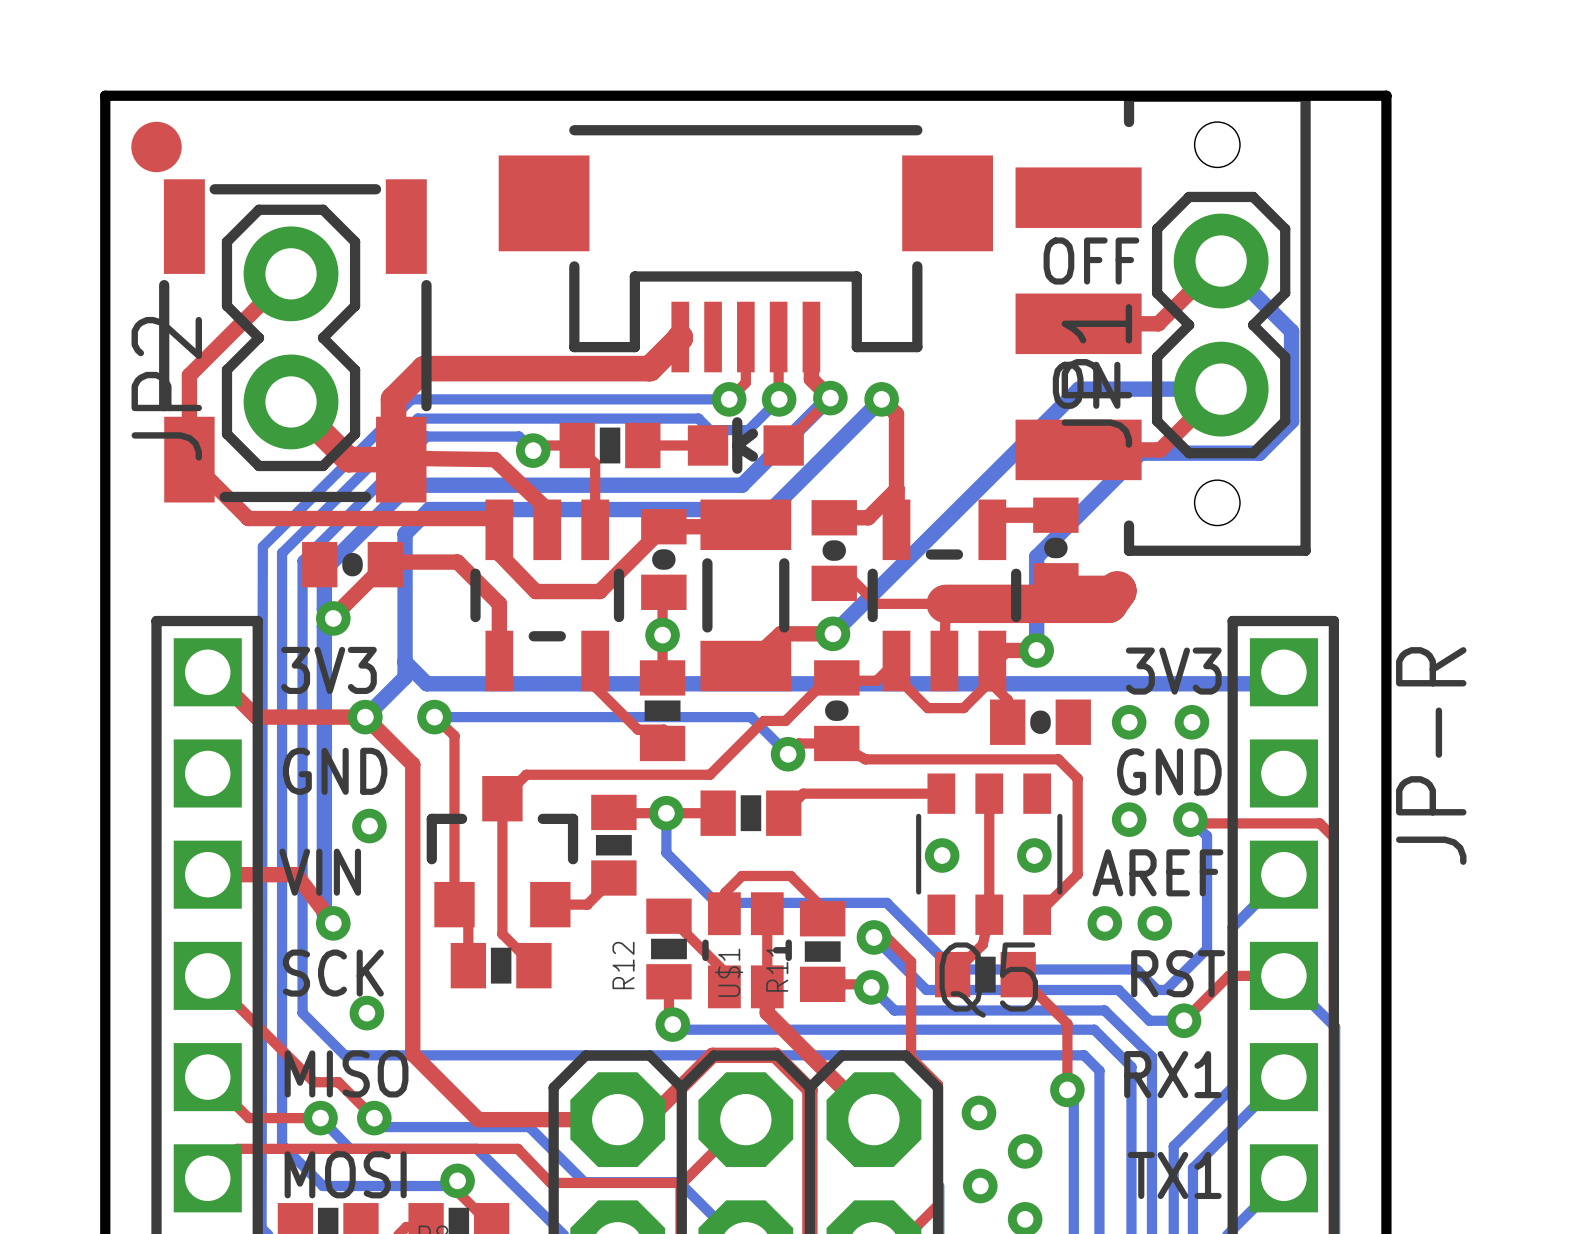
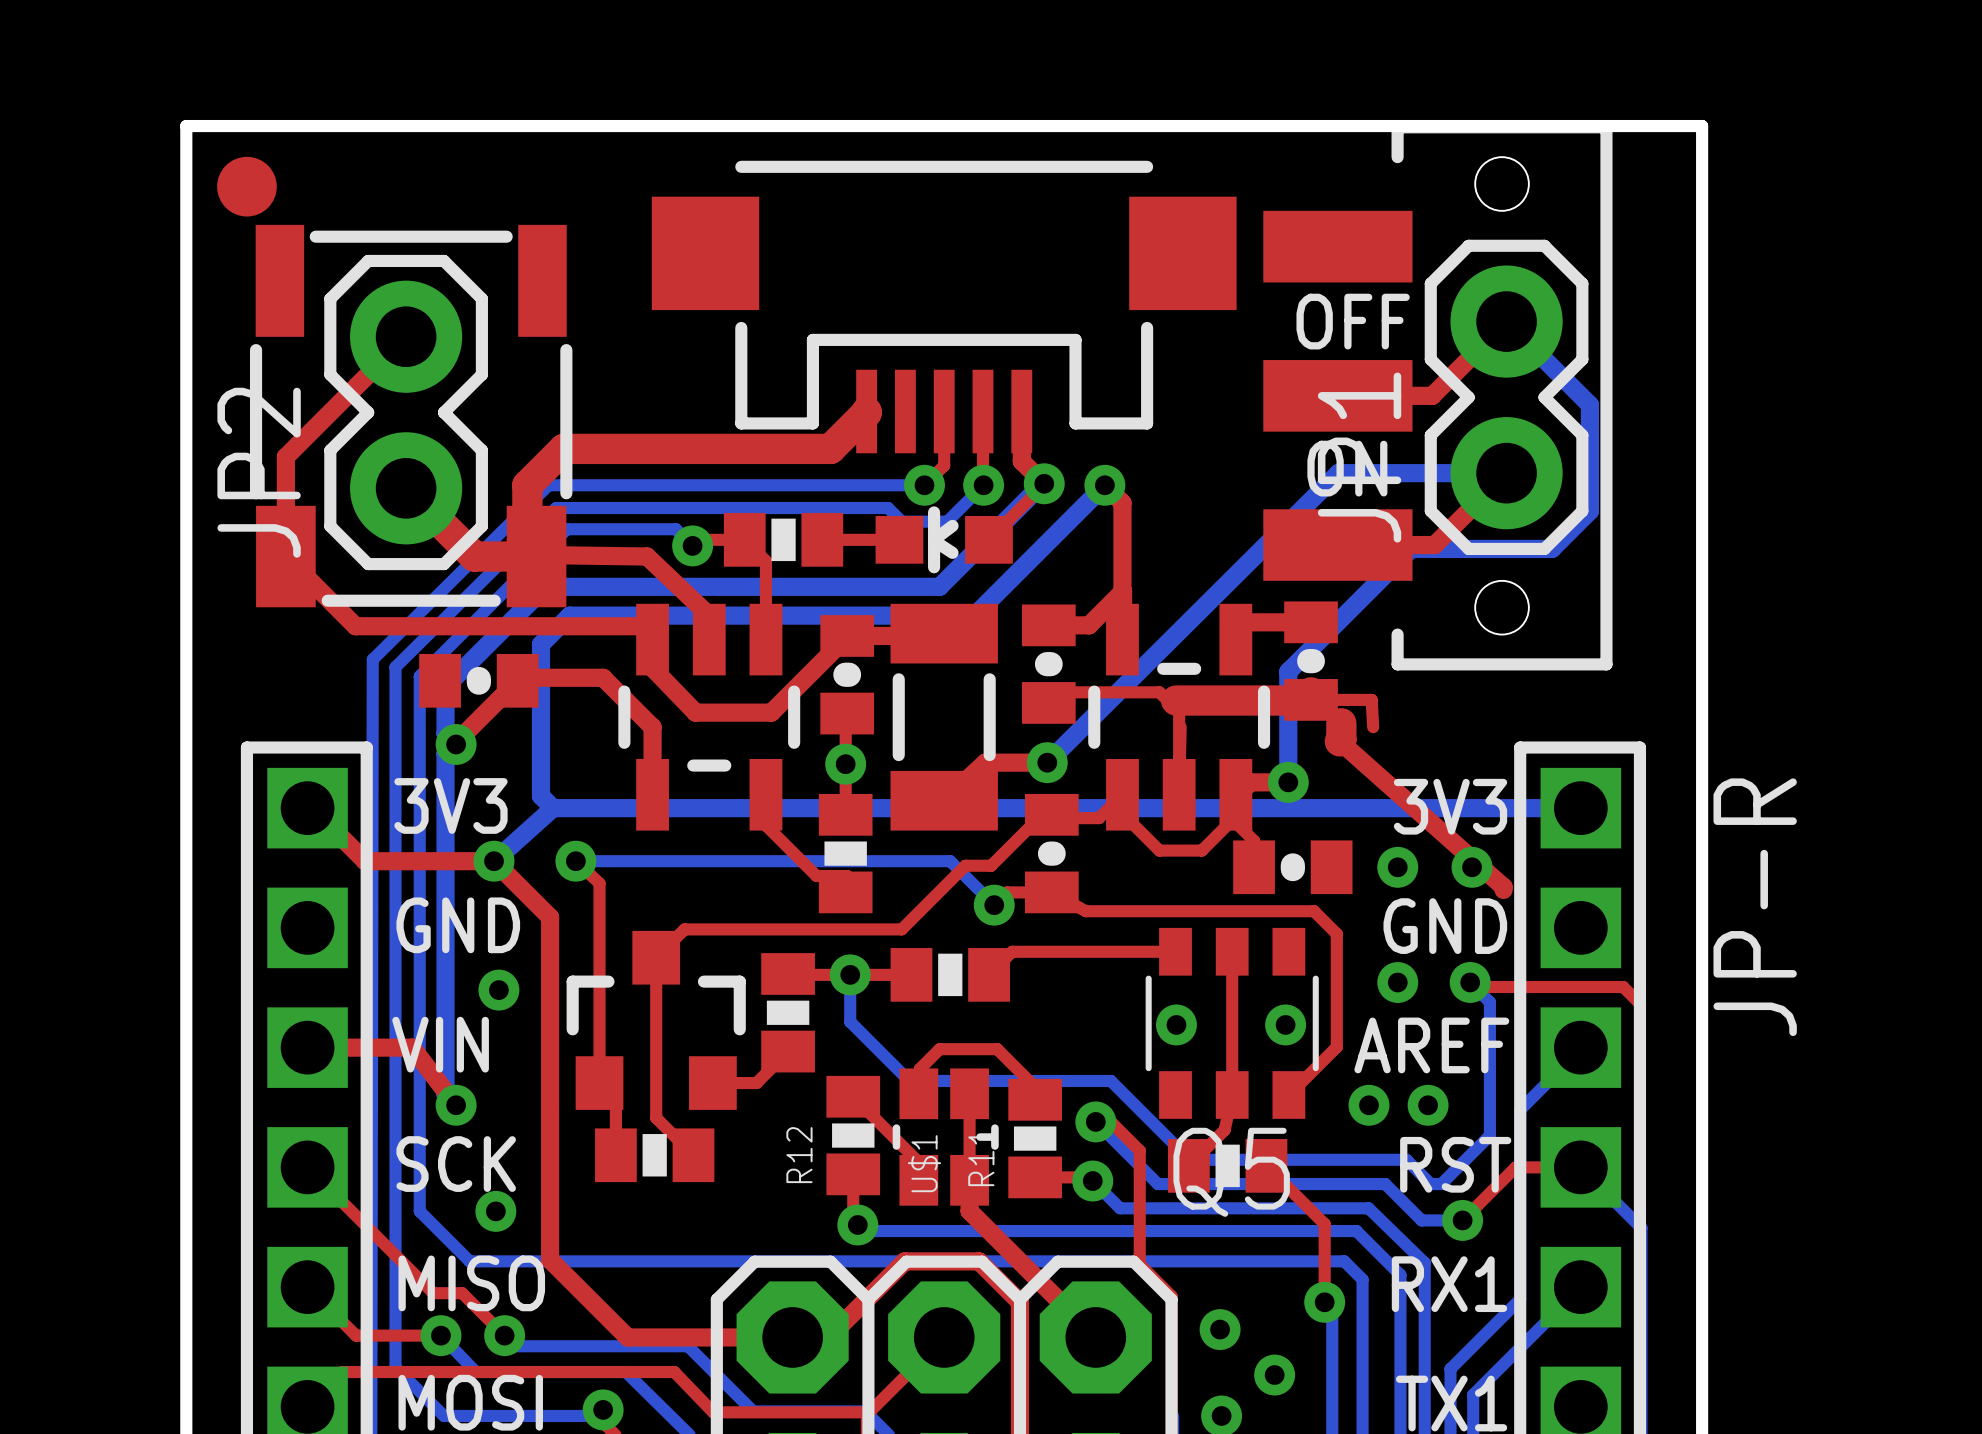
top track: none -> (1315, 686) (1309, 686) (1310, 700) (1176, 700)
top track: (847, 574) (876, 603) (1108, 603) (1117, 591) -> (1063, 692) (1159, 692) (1179, 712) (1179, 794)
top track: none -> (1341, 723) (1339, 741) (1503, 886) (1503, 889)
bottom track: (405, 662) (405, 677) (365, 717) -> none
bottom track: (415, 672) (426, 683) (1272, 683) (1283, 672) -> (494, 861) (553, 808) (1580, 808)

